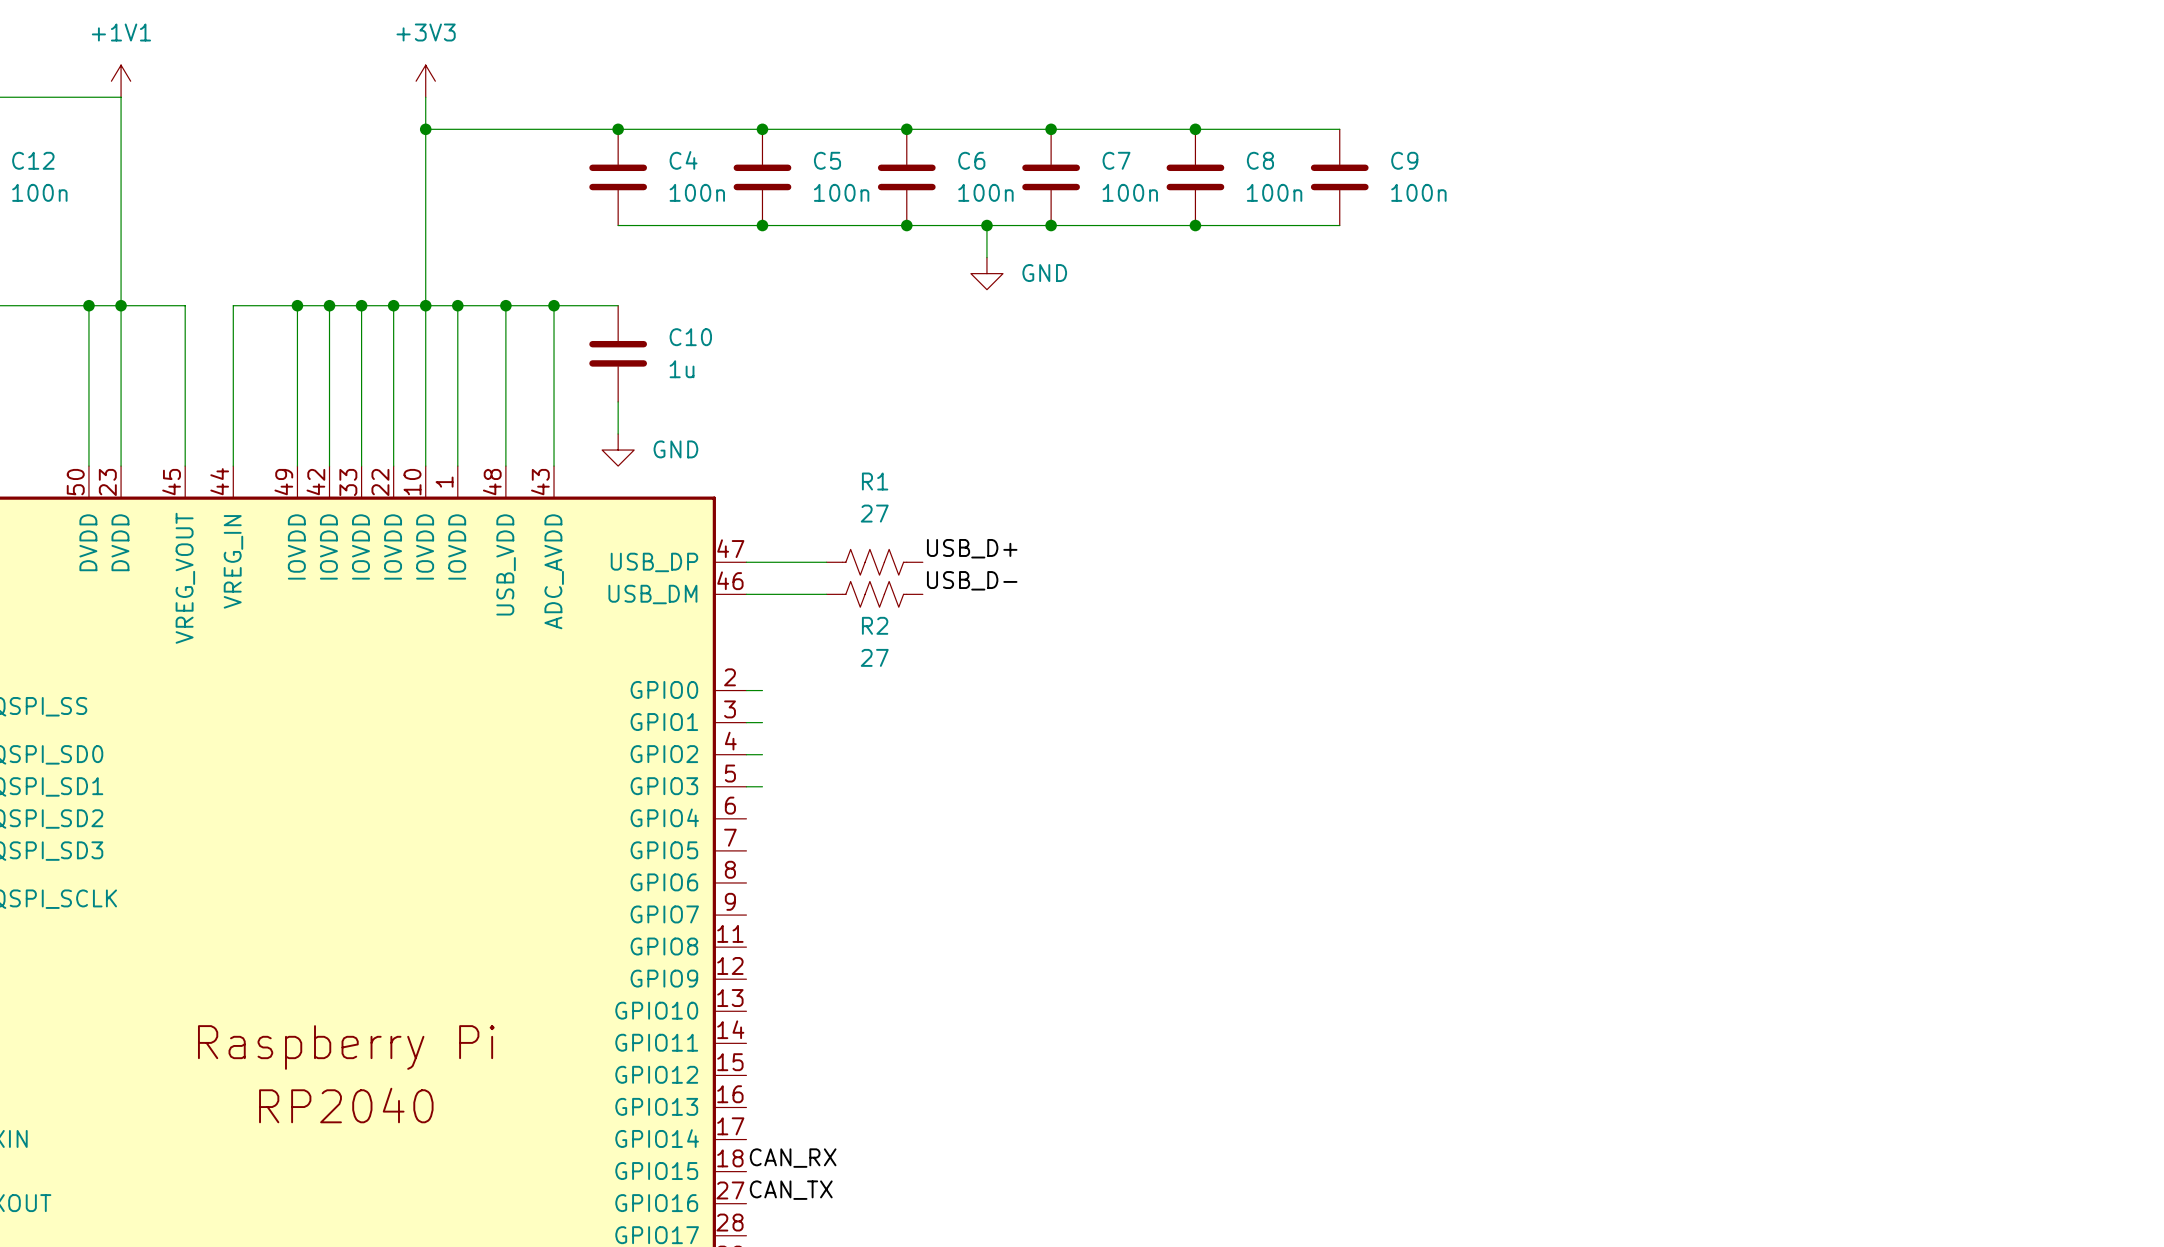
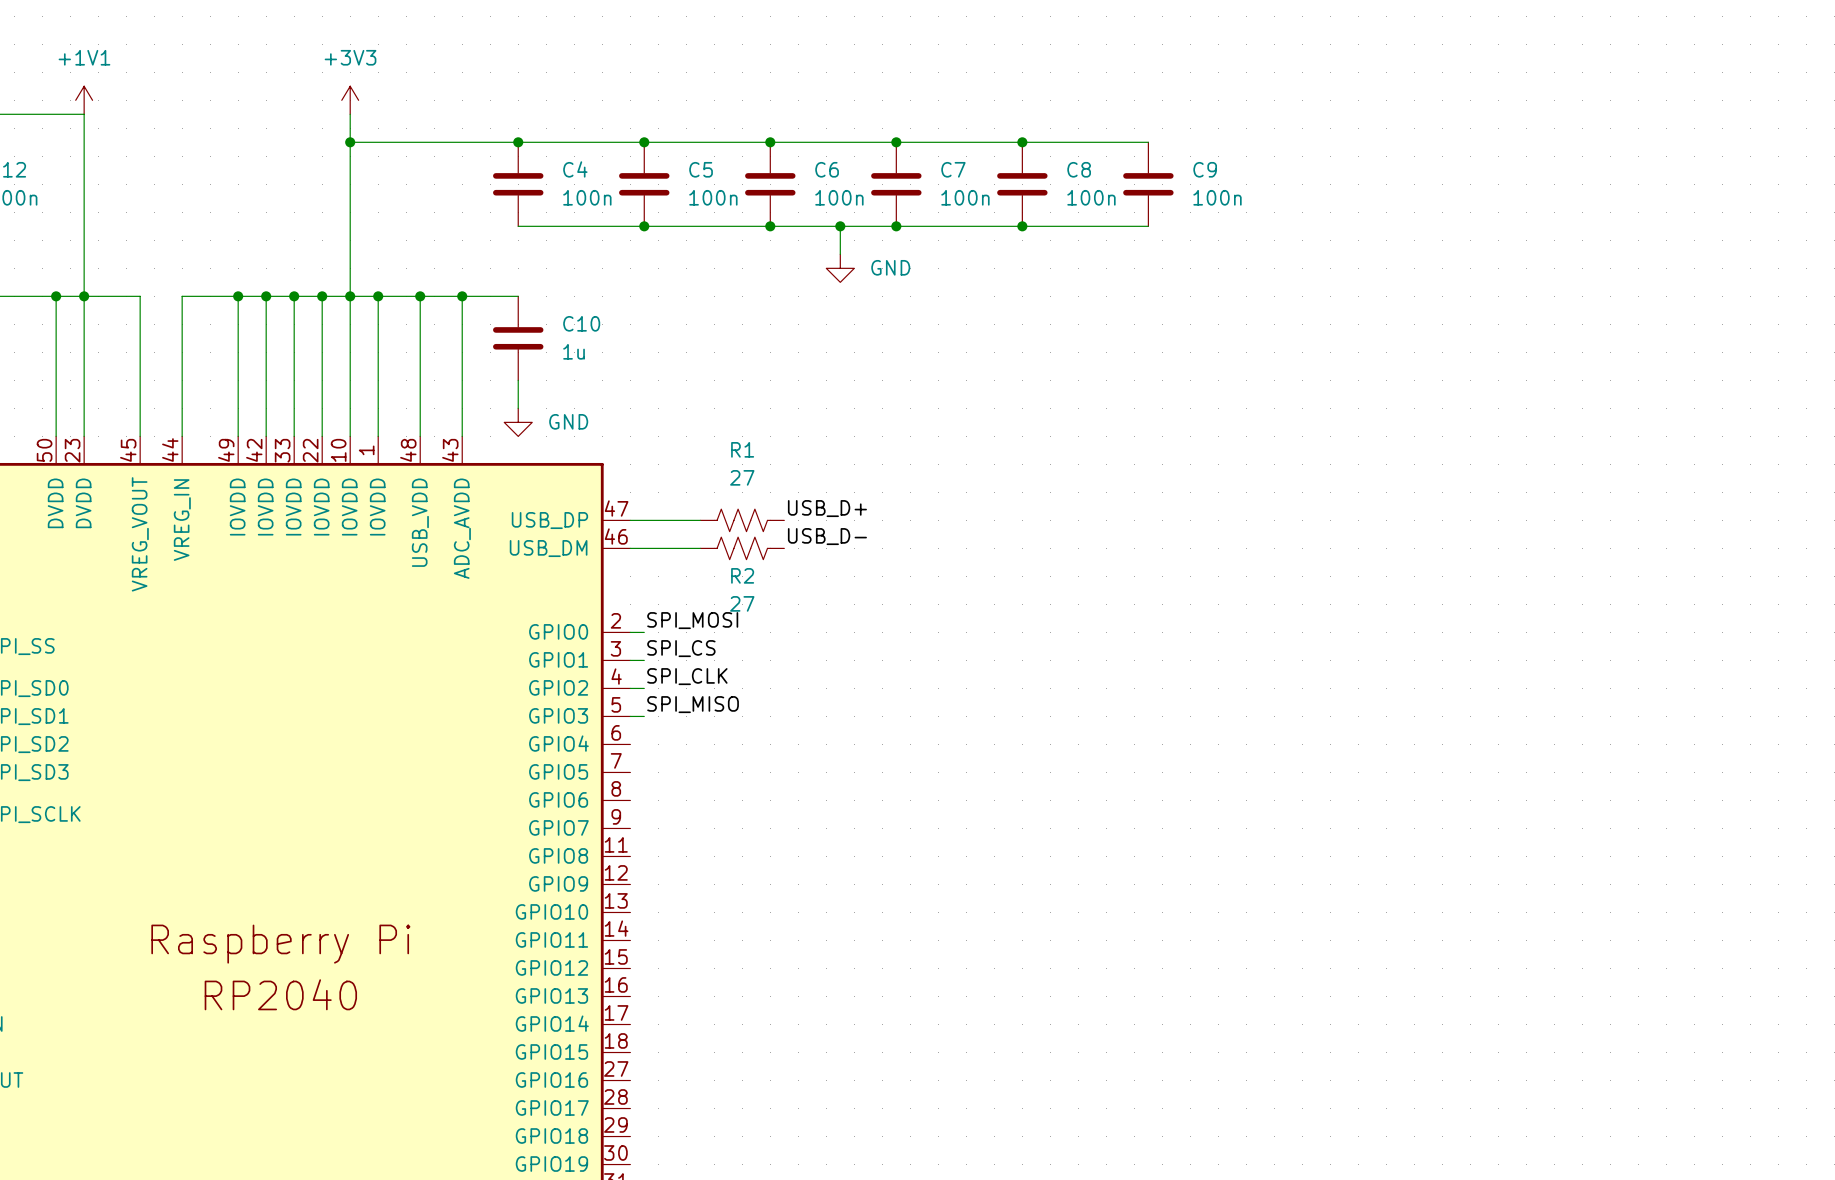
label: none -> SPI_MOSI (692, 620)
label: none -> SPI_CS (681, 648)
label: none -> SPI_CLK (687, 676)
label: none -> SPI_MISO (693, 704)
label: CAN_RX (793, 1158) -> none
label: CAN_TX (791, 1190) -> none

